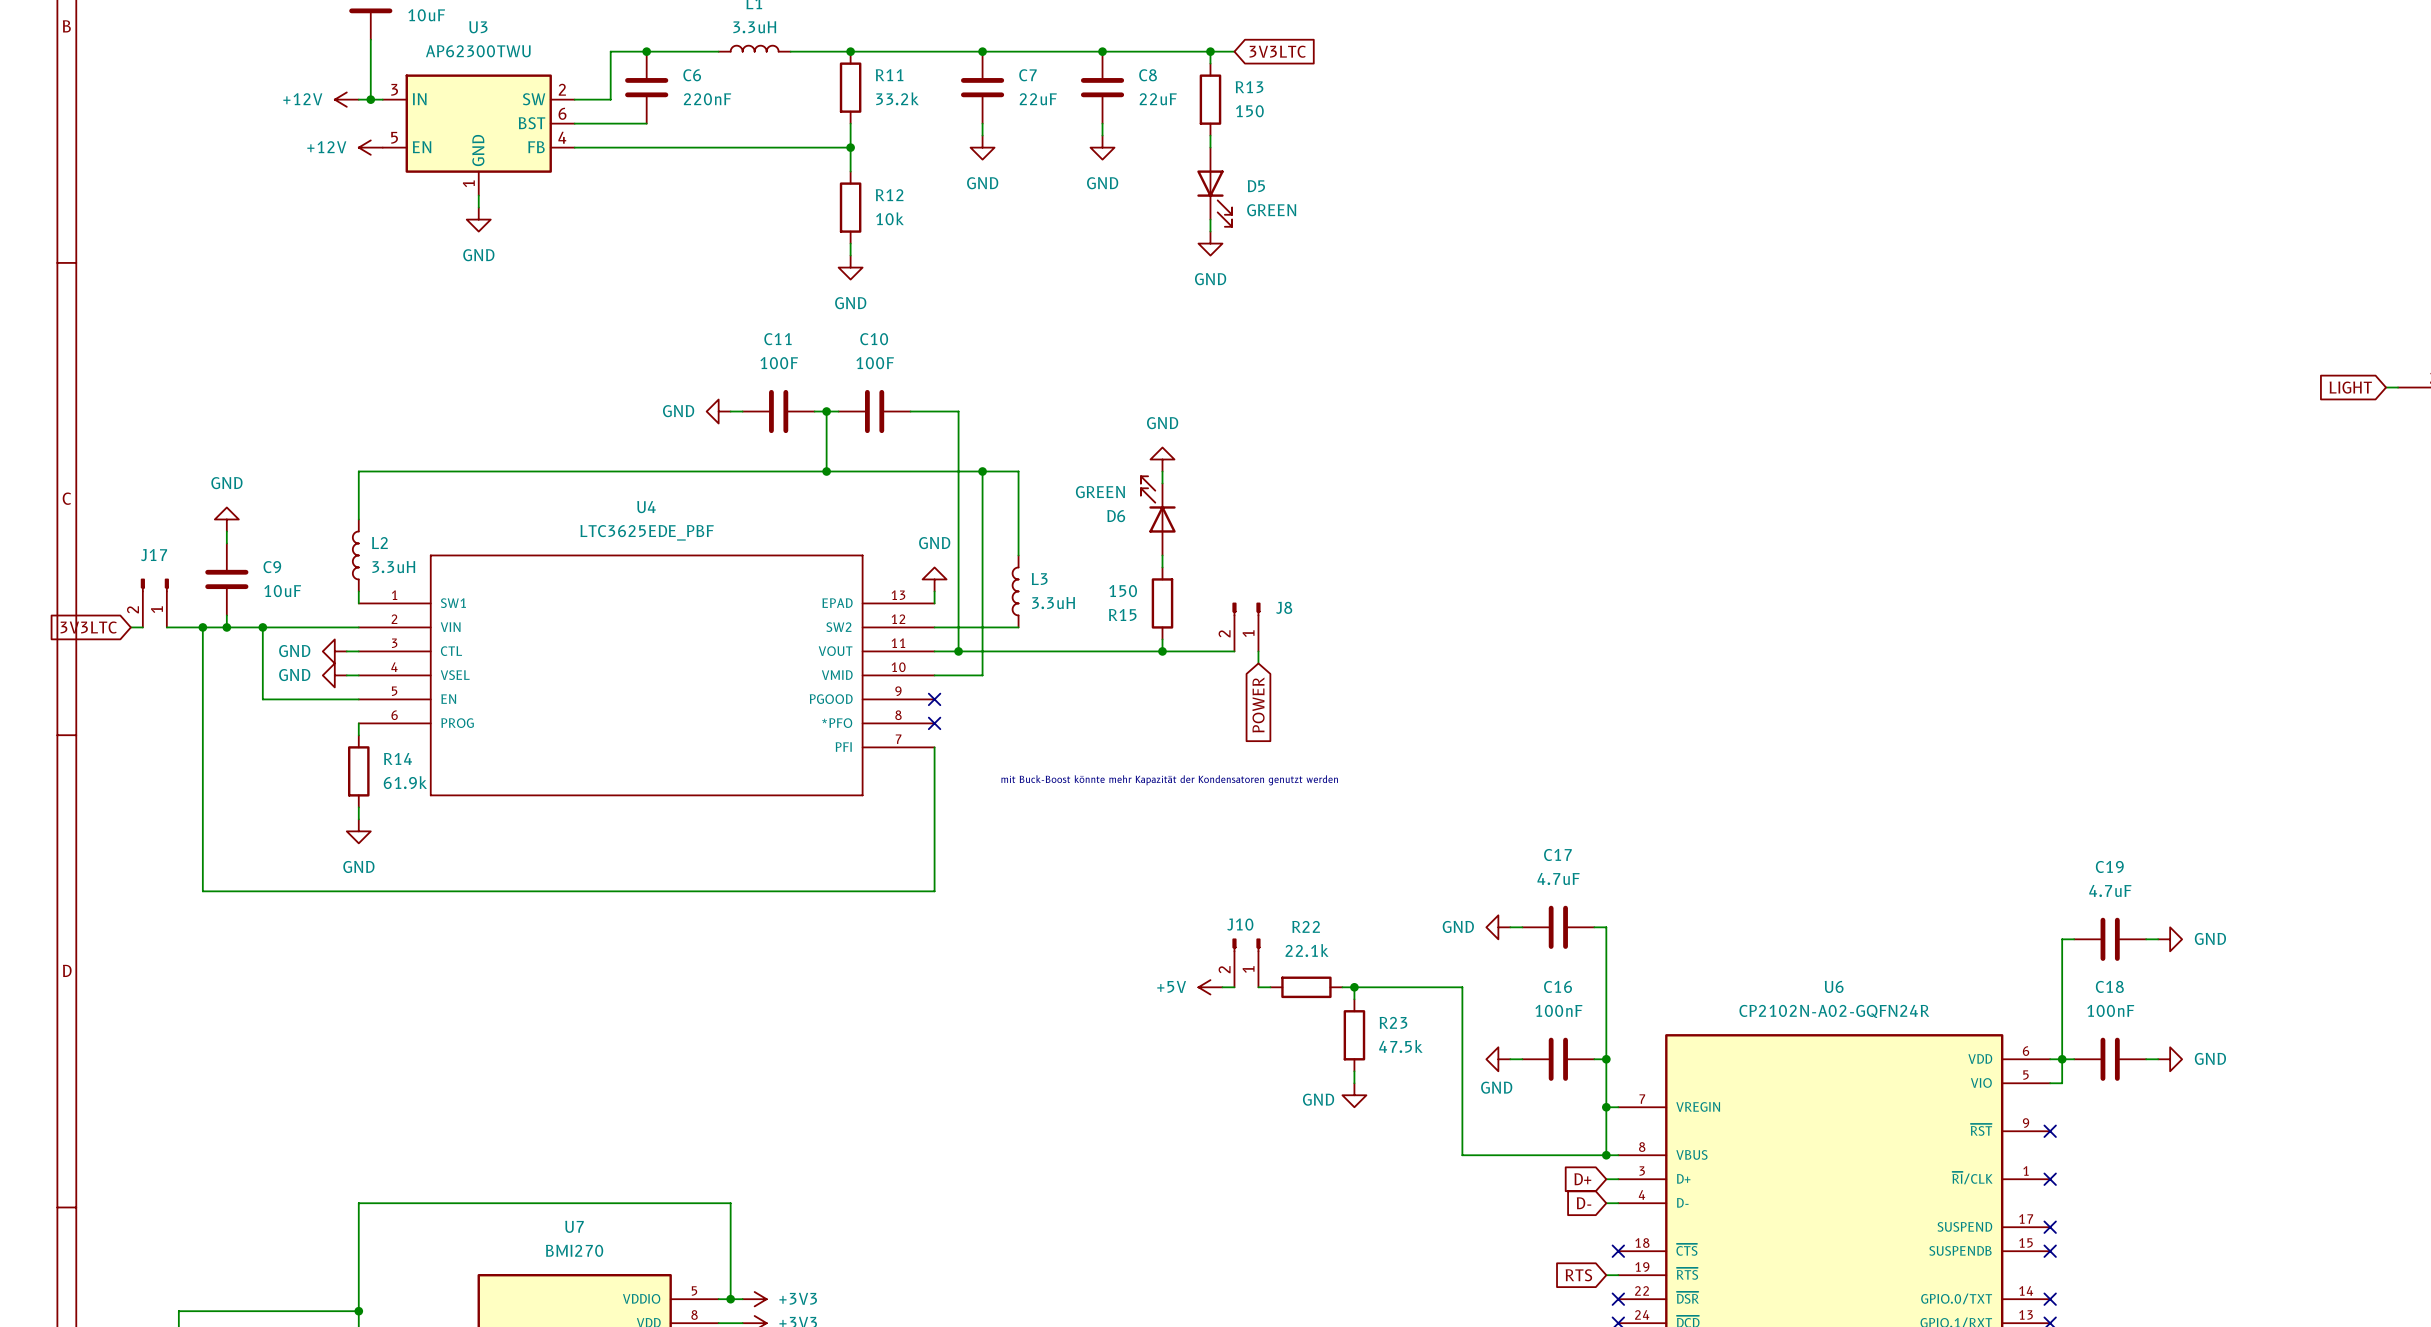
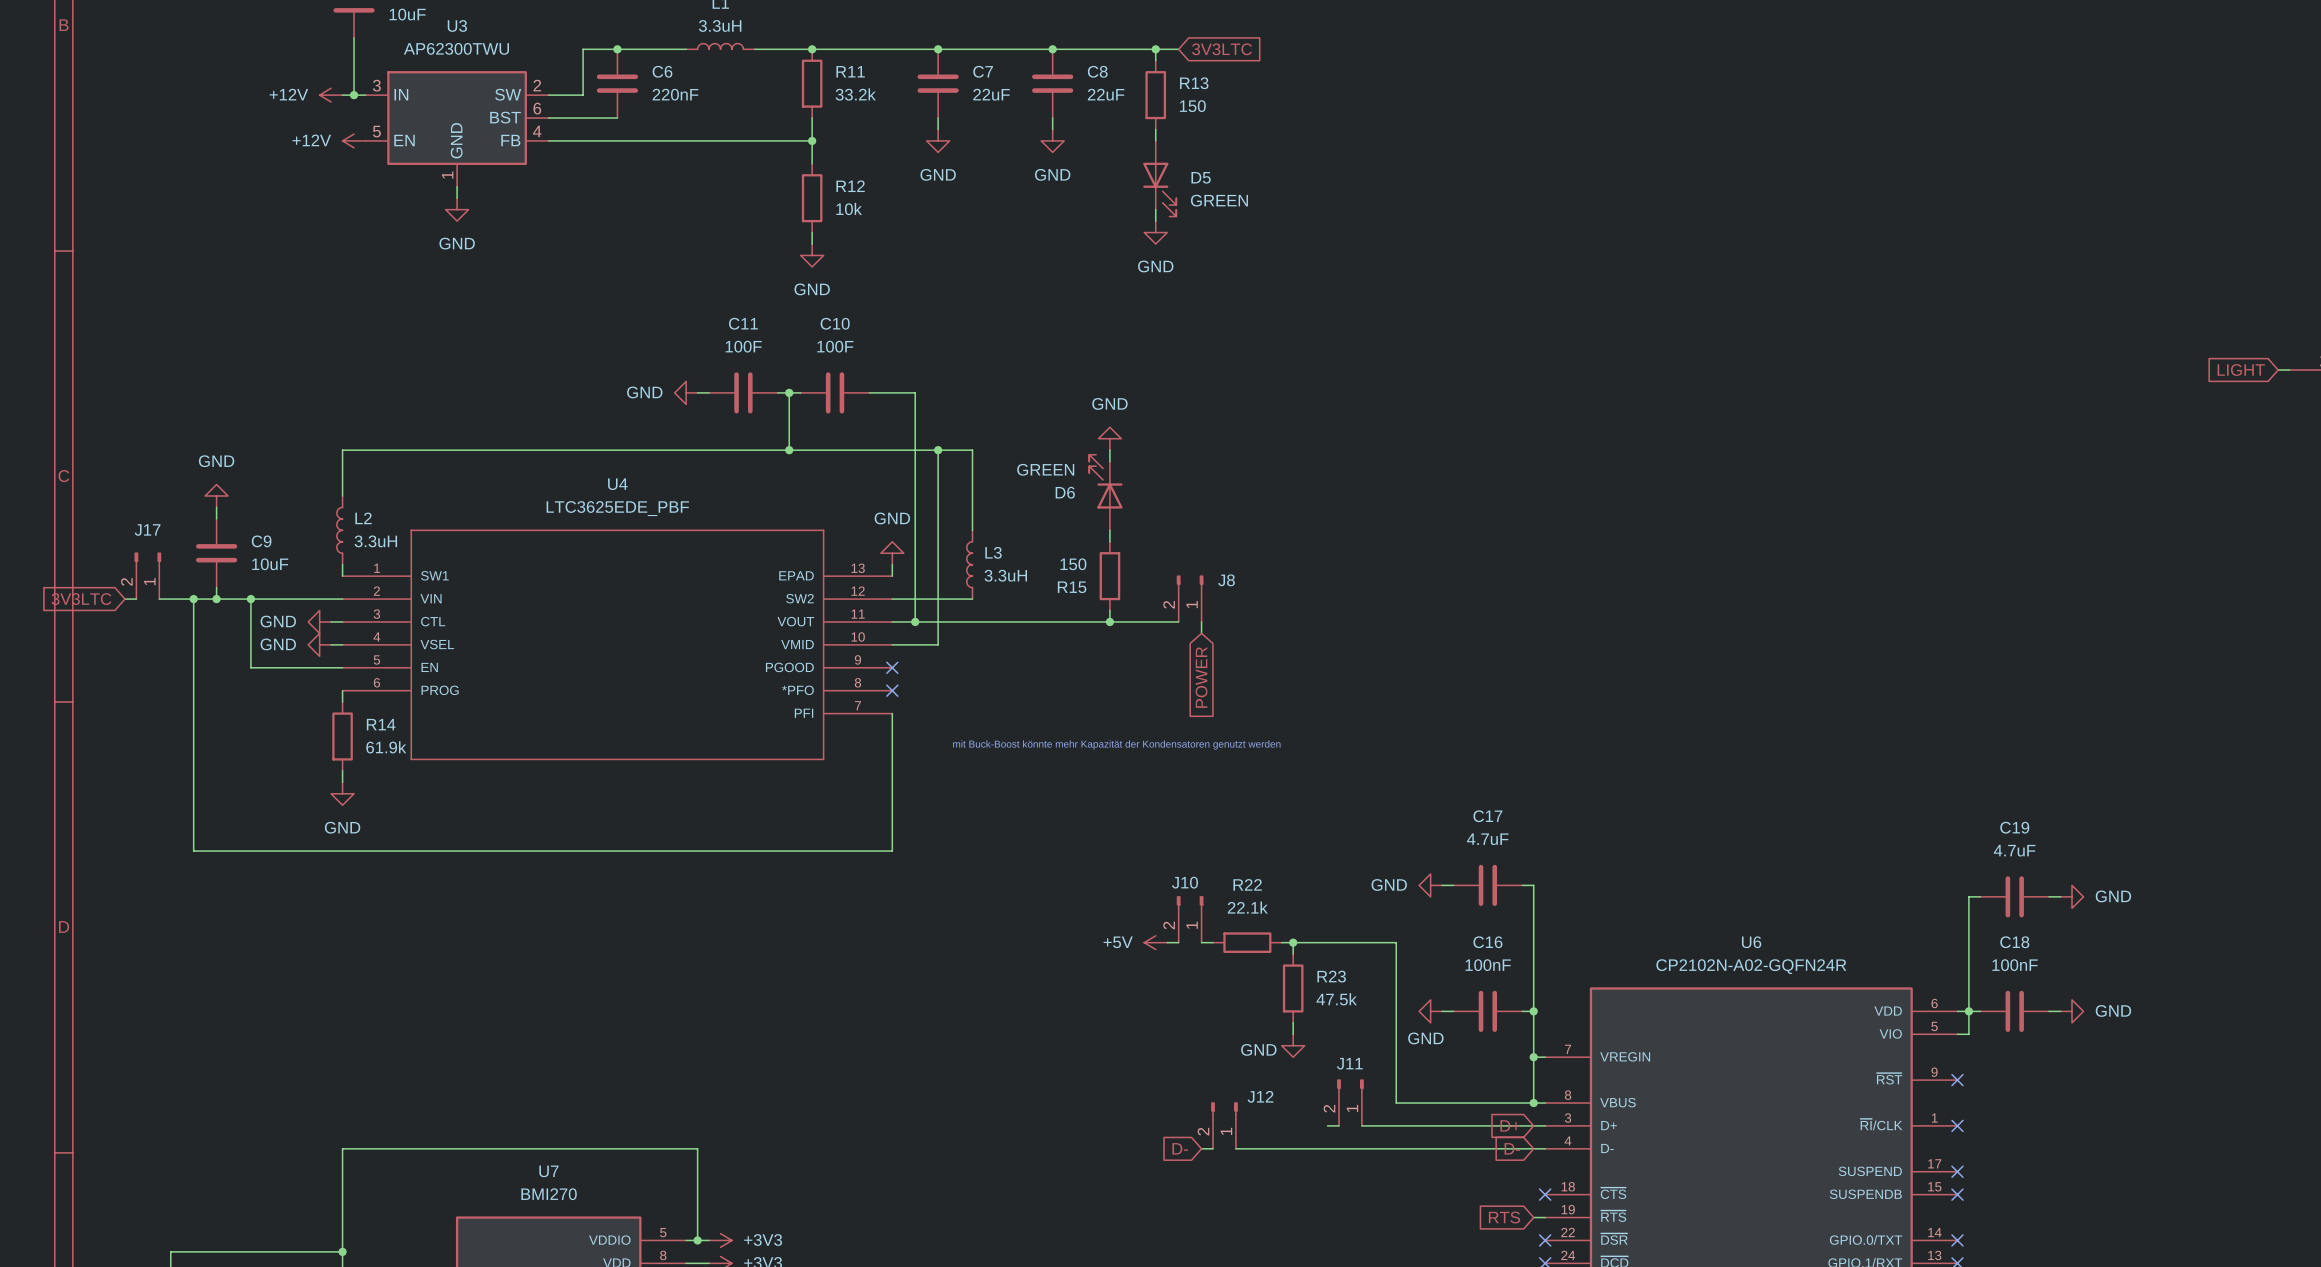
J11: none -> (1350, 1102)
J12: none -> (1224, 1125)
wire: none -> (1327, 1125) (1339, 1125)
wire: none -> (1361, 1125) (1533, 1125)
global label: none -> D- (1180, 1148)
wire: none -> (1201, 1148) (1213, 1148)
wire: none -> (1235, 1148) (1533, 1148)

